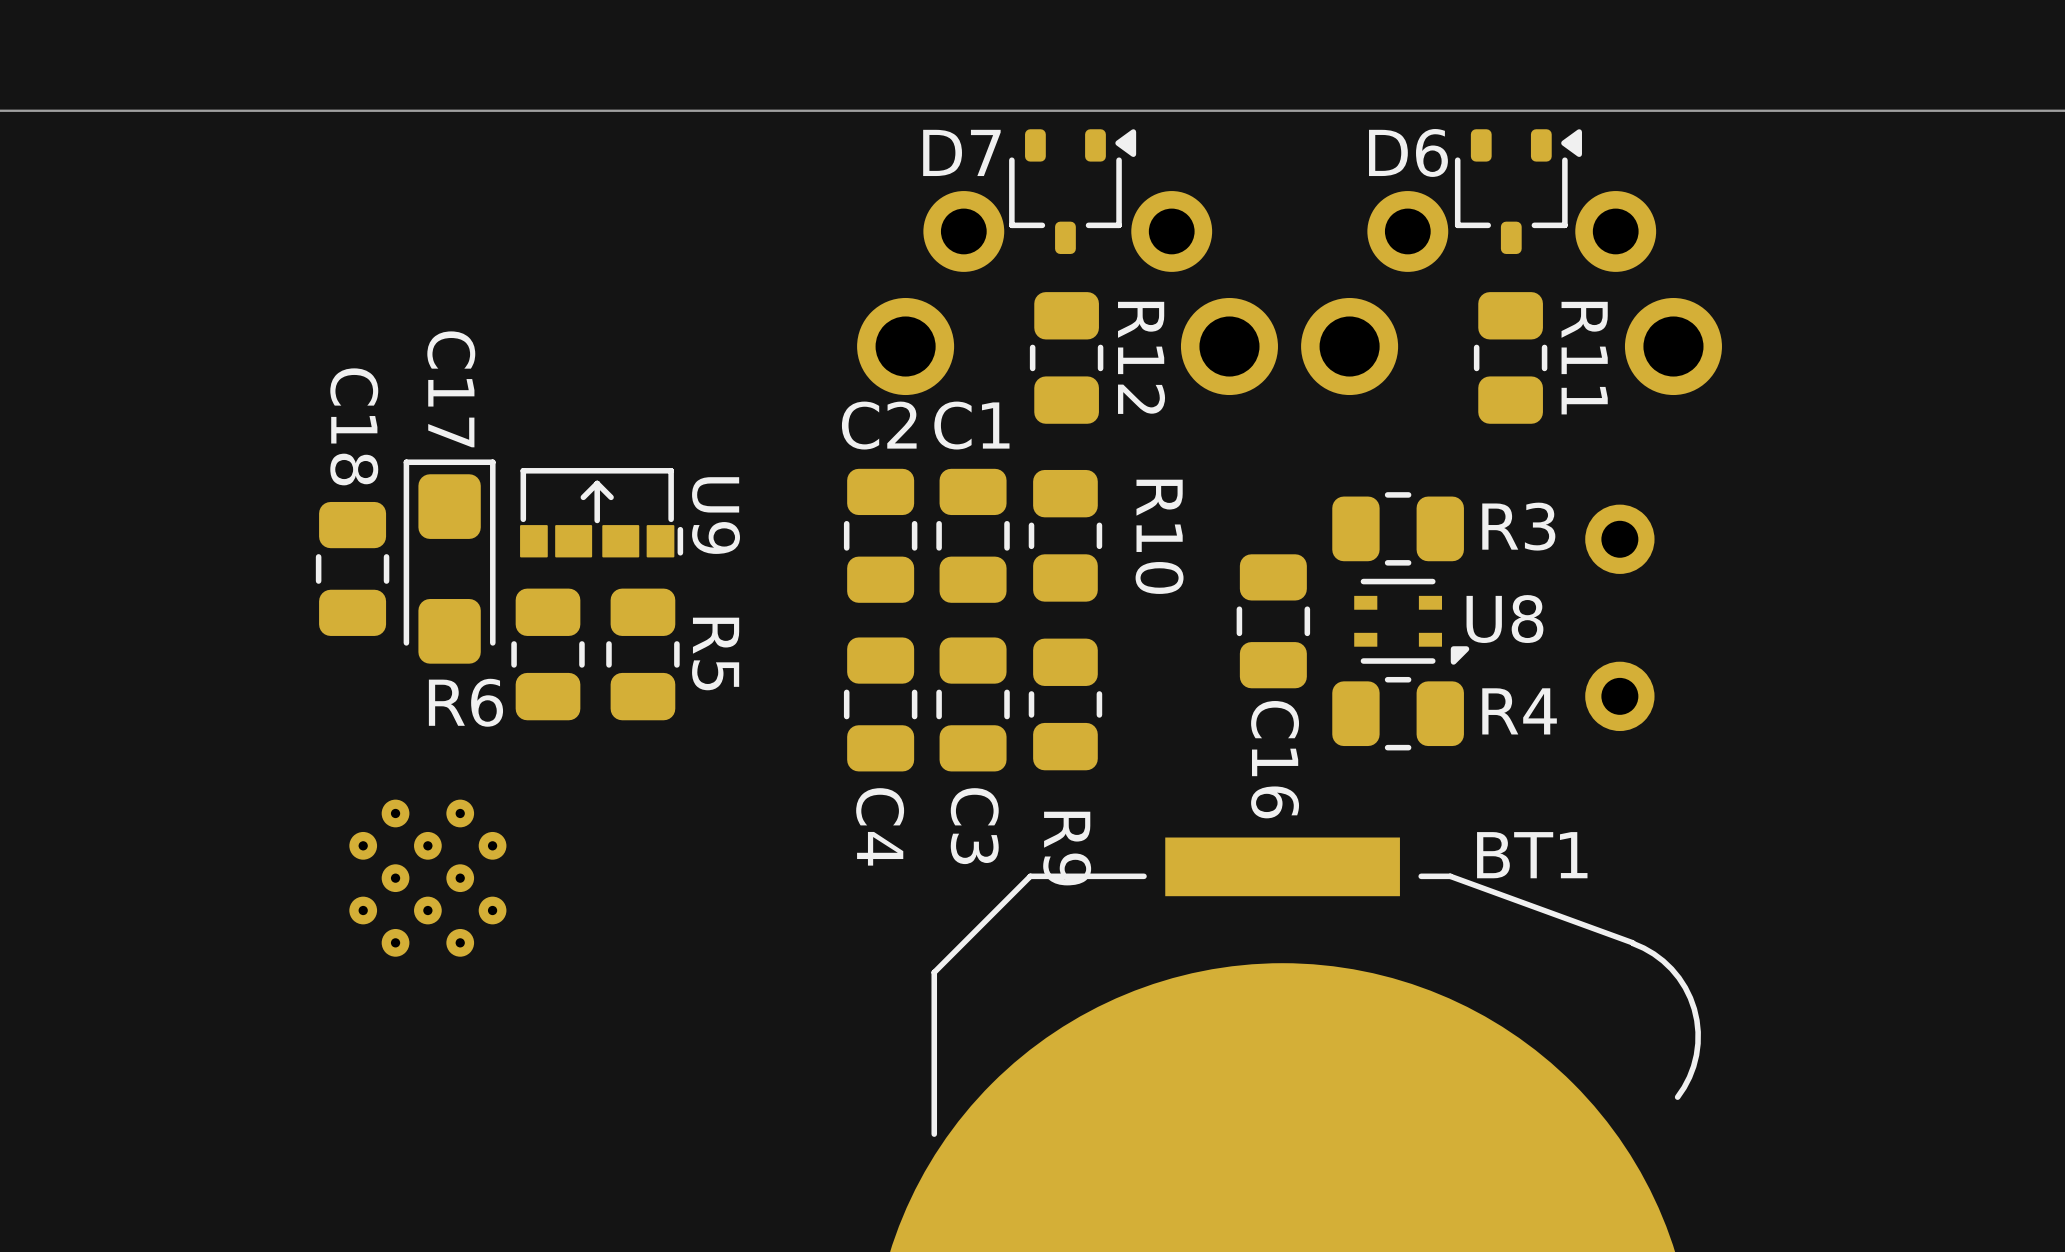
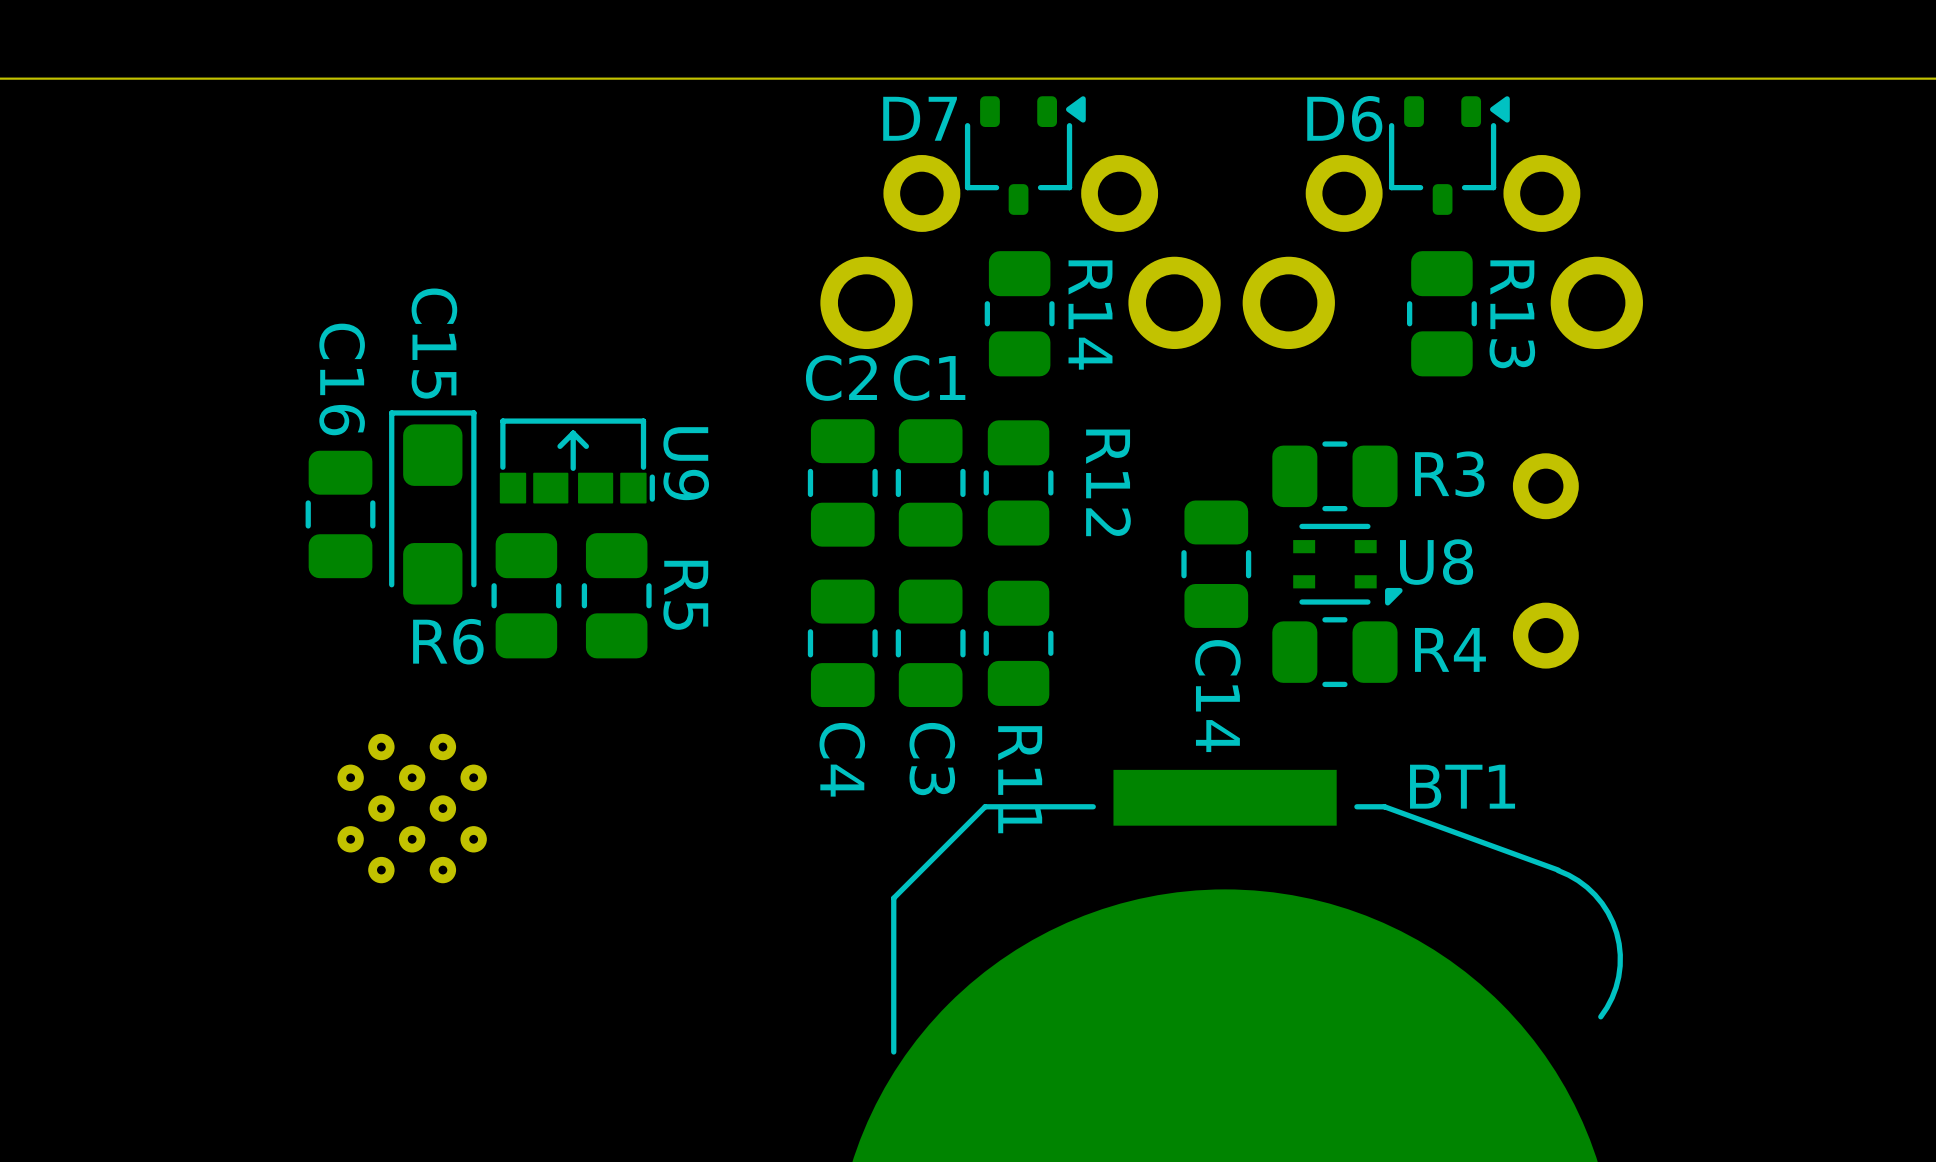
R12 name: R12 (1141, 357) -> R14 (1090, 315)
R11 name: R11 (1584, 358) -> R13 (1512, 314)
C17 name: C17 (451, 389) -> C15 (434, 343)
C18 name: C18 (354, 426) -> C16 (342, 379)
R10 name: R10 (1159, 536) -> R12 (1108, 482)
C16 name: C16 (1275, 759) -> C14 (1217, 696)
R9 name: R9 (1067, 848) -> R11 (1020, 779)

